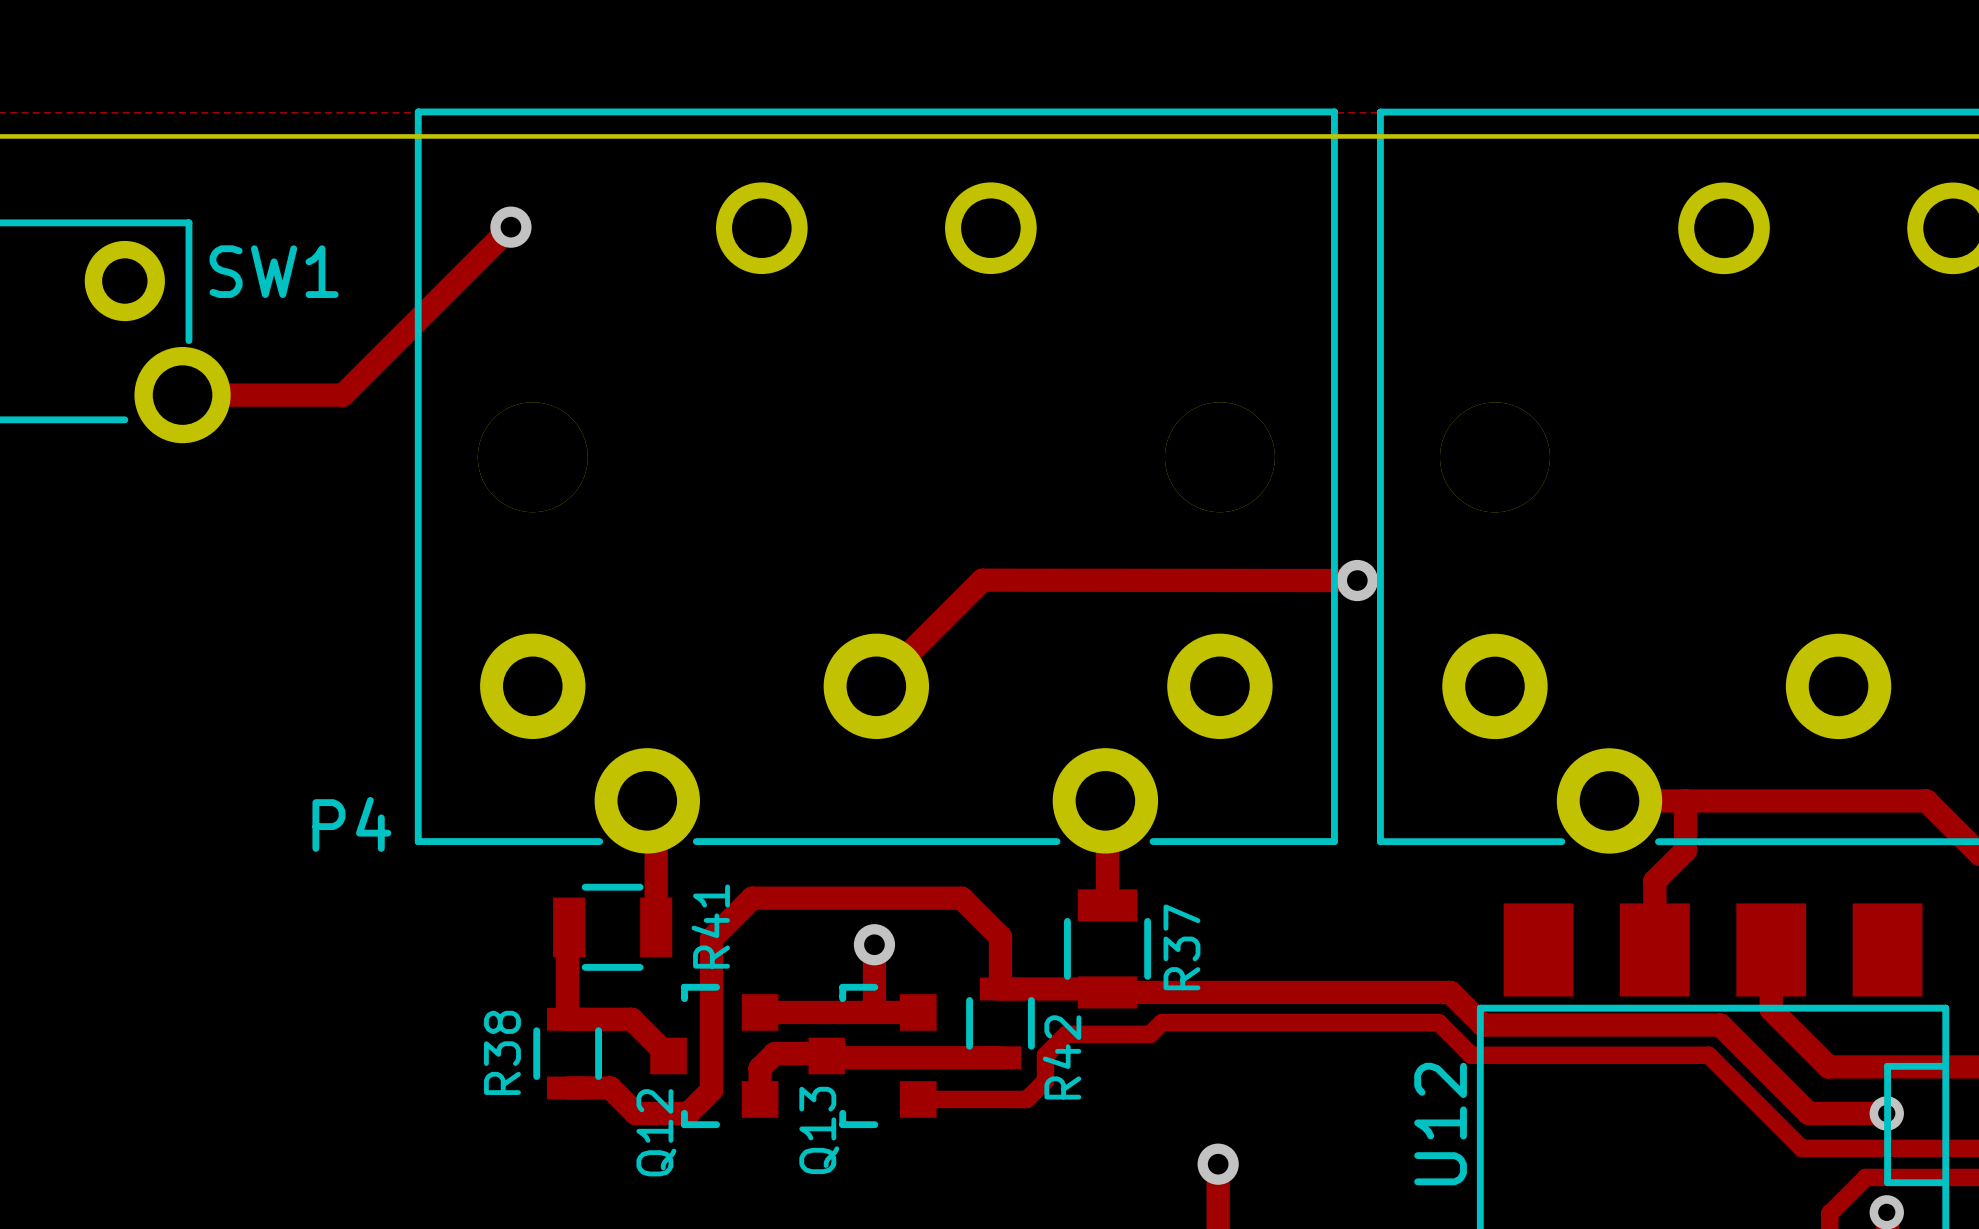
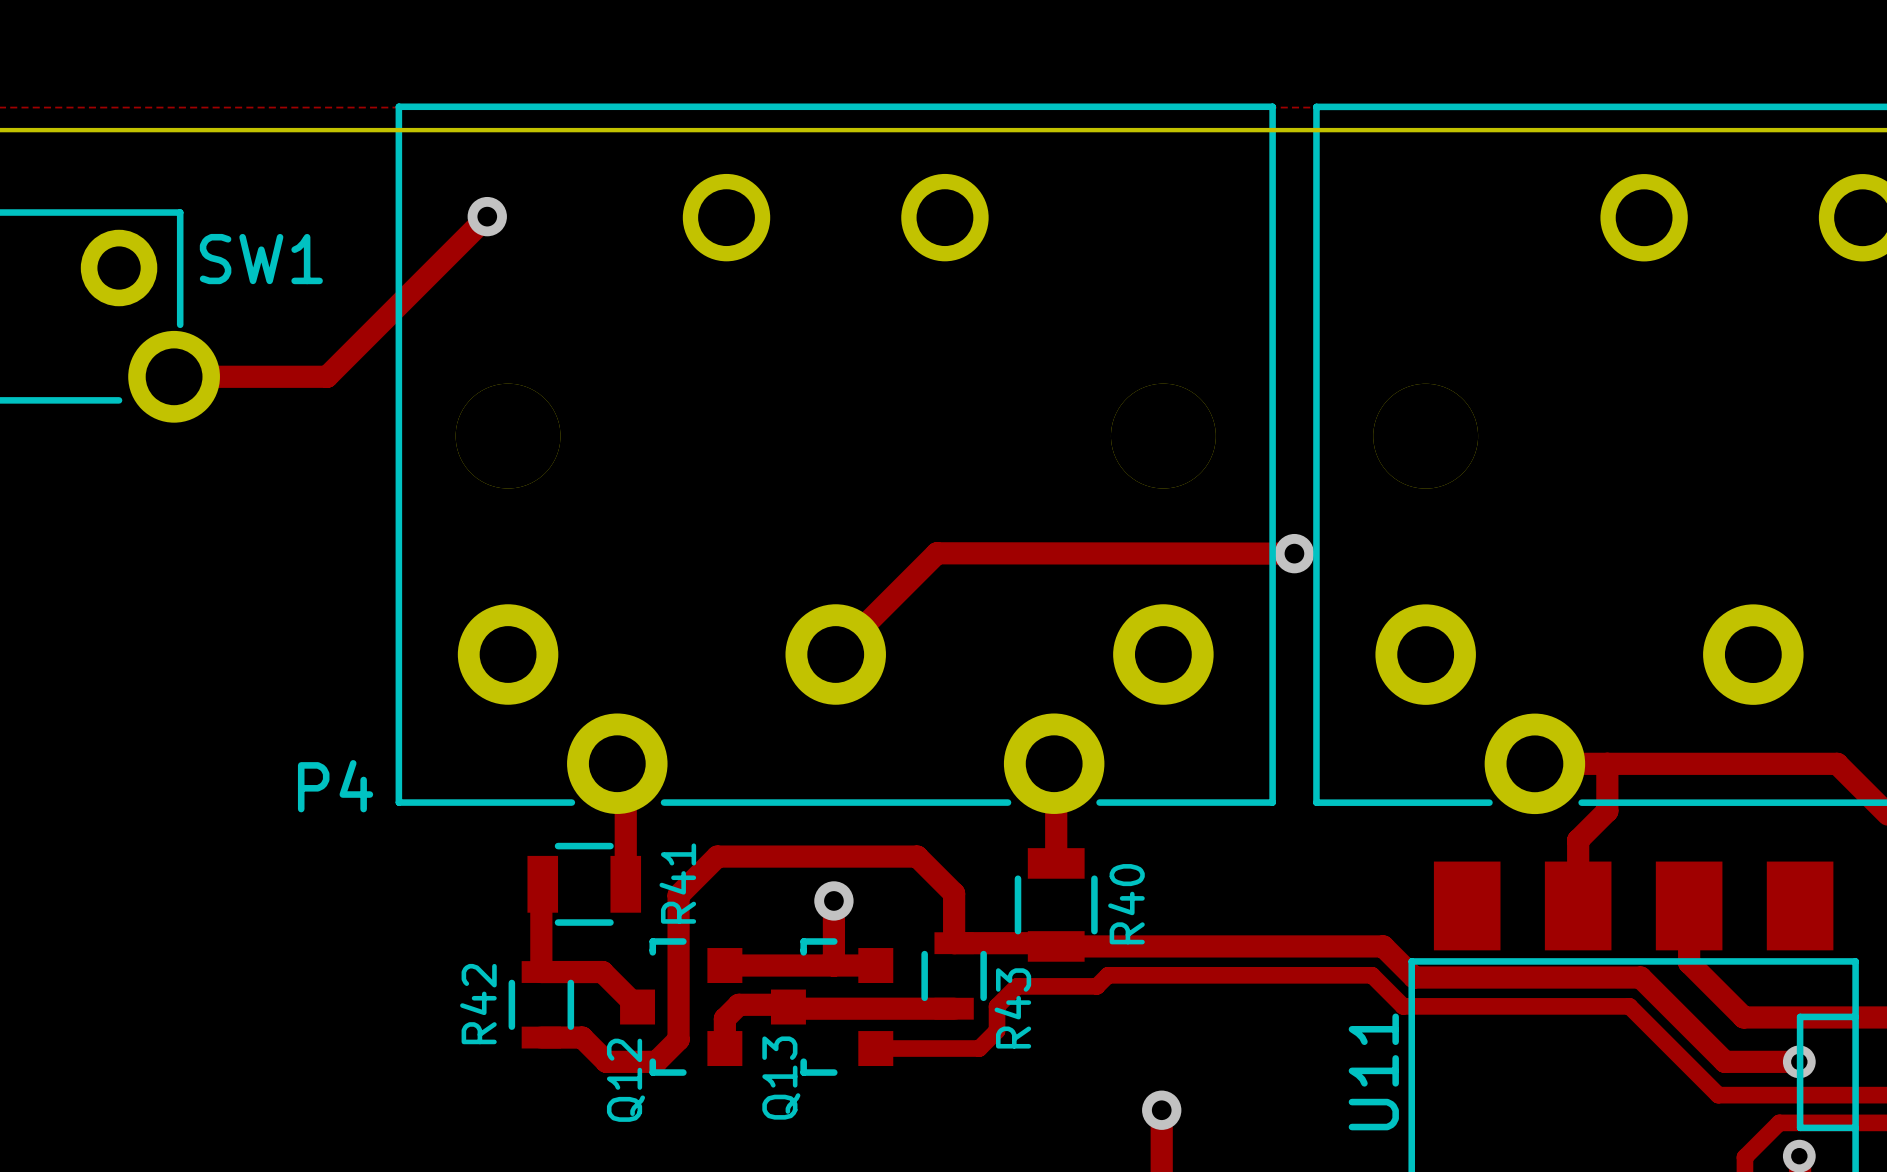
R37 name: R37 (1181, 947) -> R40 (1126, 904)
R38 name: R38 (502, 1052) -> R42 (478, 1004)
R42 name: R42 (1062, 1057) -> R43 (1012, 1008)
U12 name: U12 (1440, 1124) -> U11 (1373, 1071)

